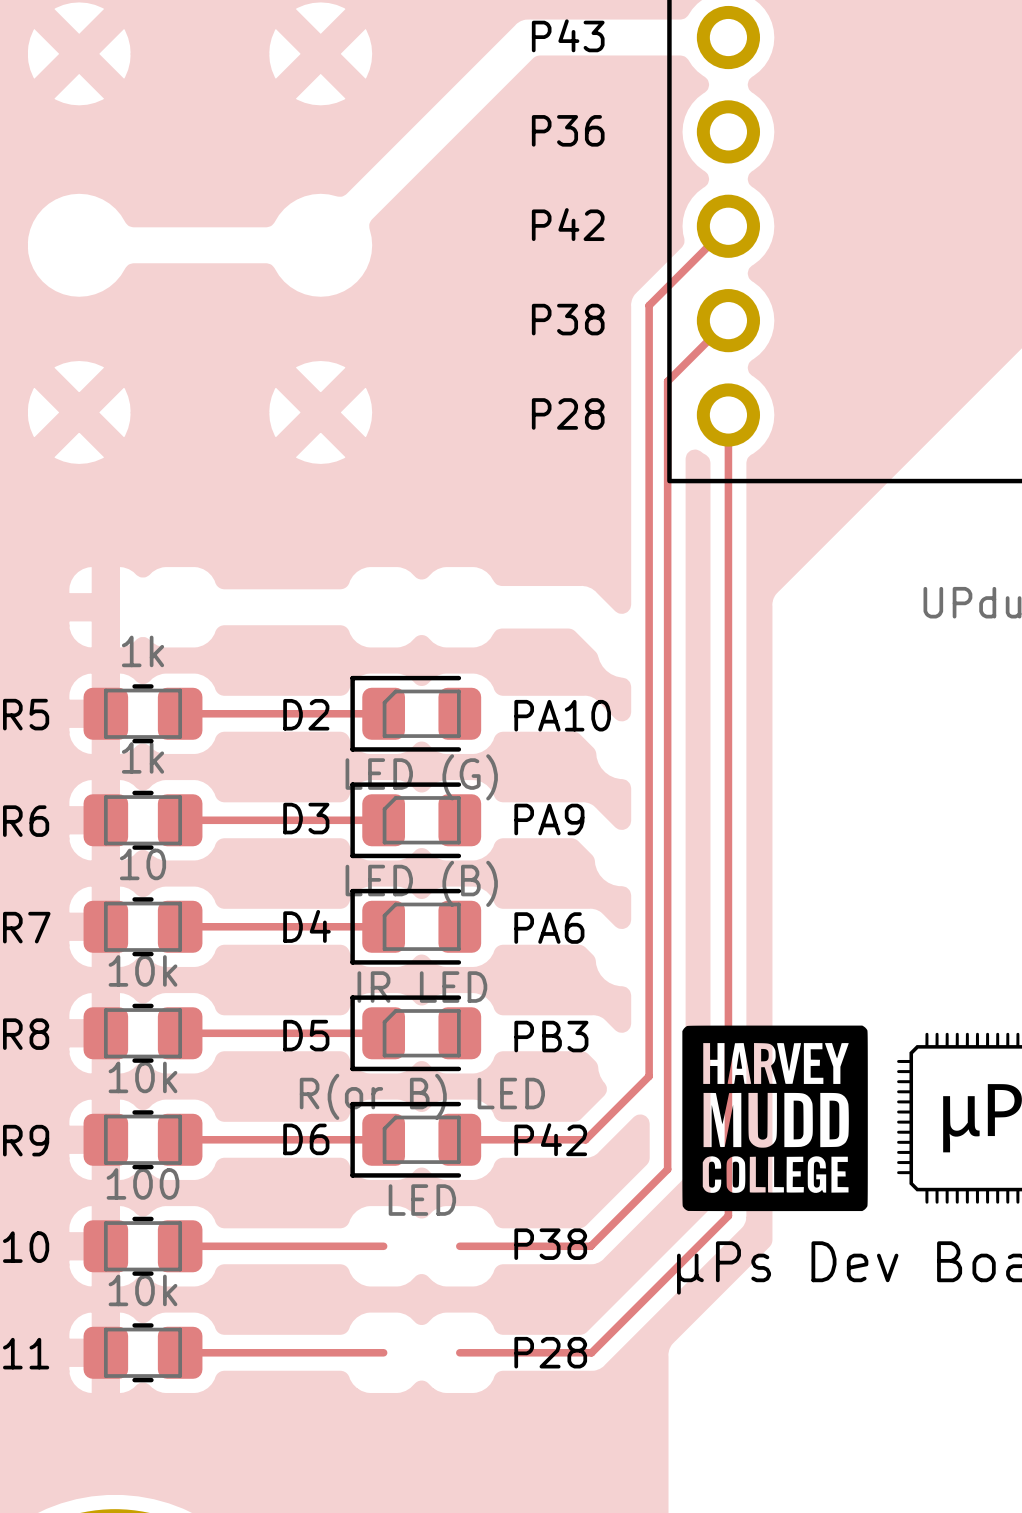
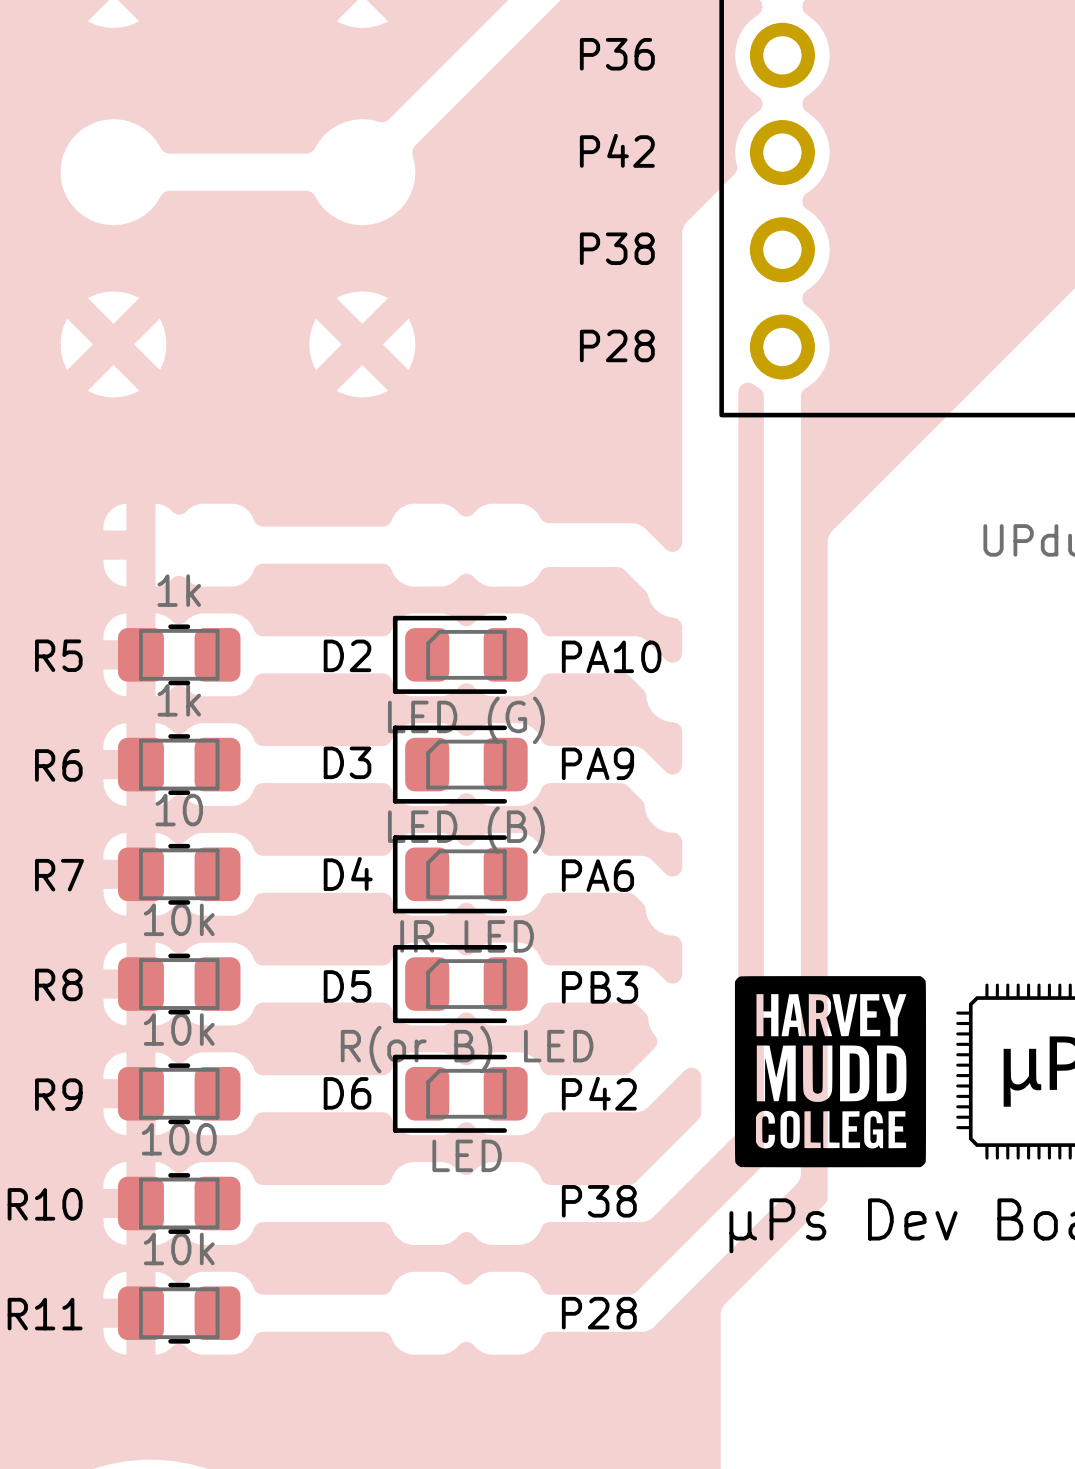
track: (728, 226) (649, 305) (649, 1076) (585, 1139) (459, 1139) -> none
track: (728, 320) (667, 381) (667, 1169) (590, 1246) (459, 1246) -> none
track: (728, 415) (728, 1215) (591, 1352) (459, 1352) -> none
track: (180, 713) (383, 713) -> none
track: (180, 820) (383, 820) -> none
track: (180, 926) (383, 926) -> none
track: (180, 1033) (383, 1033) -> none
track: (180, 1139) (383, 1139) -> none
track: (180, 1246) (383, 1246) -> none
track: (180, 1352) (383, 1352) -> none

